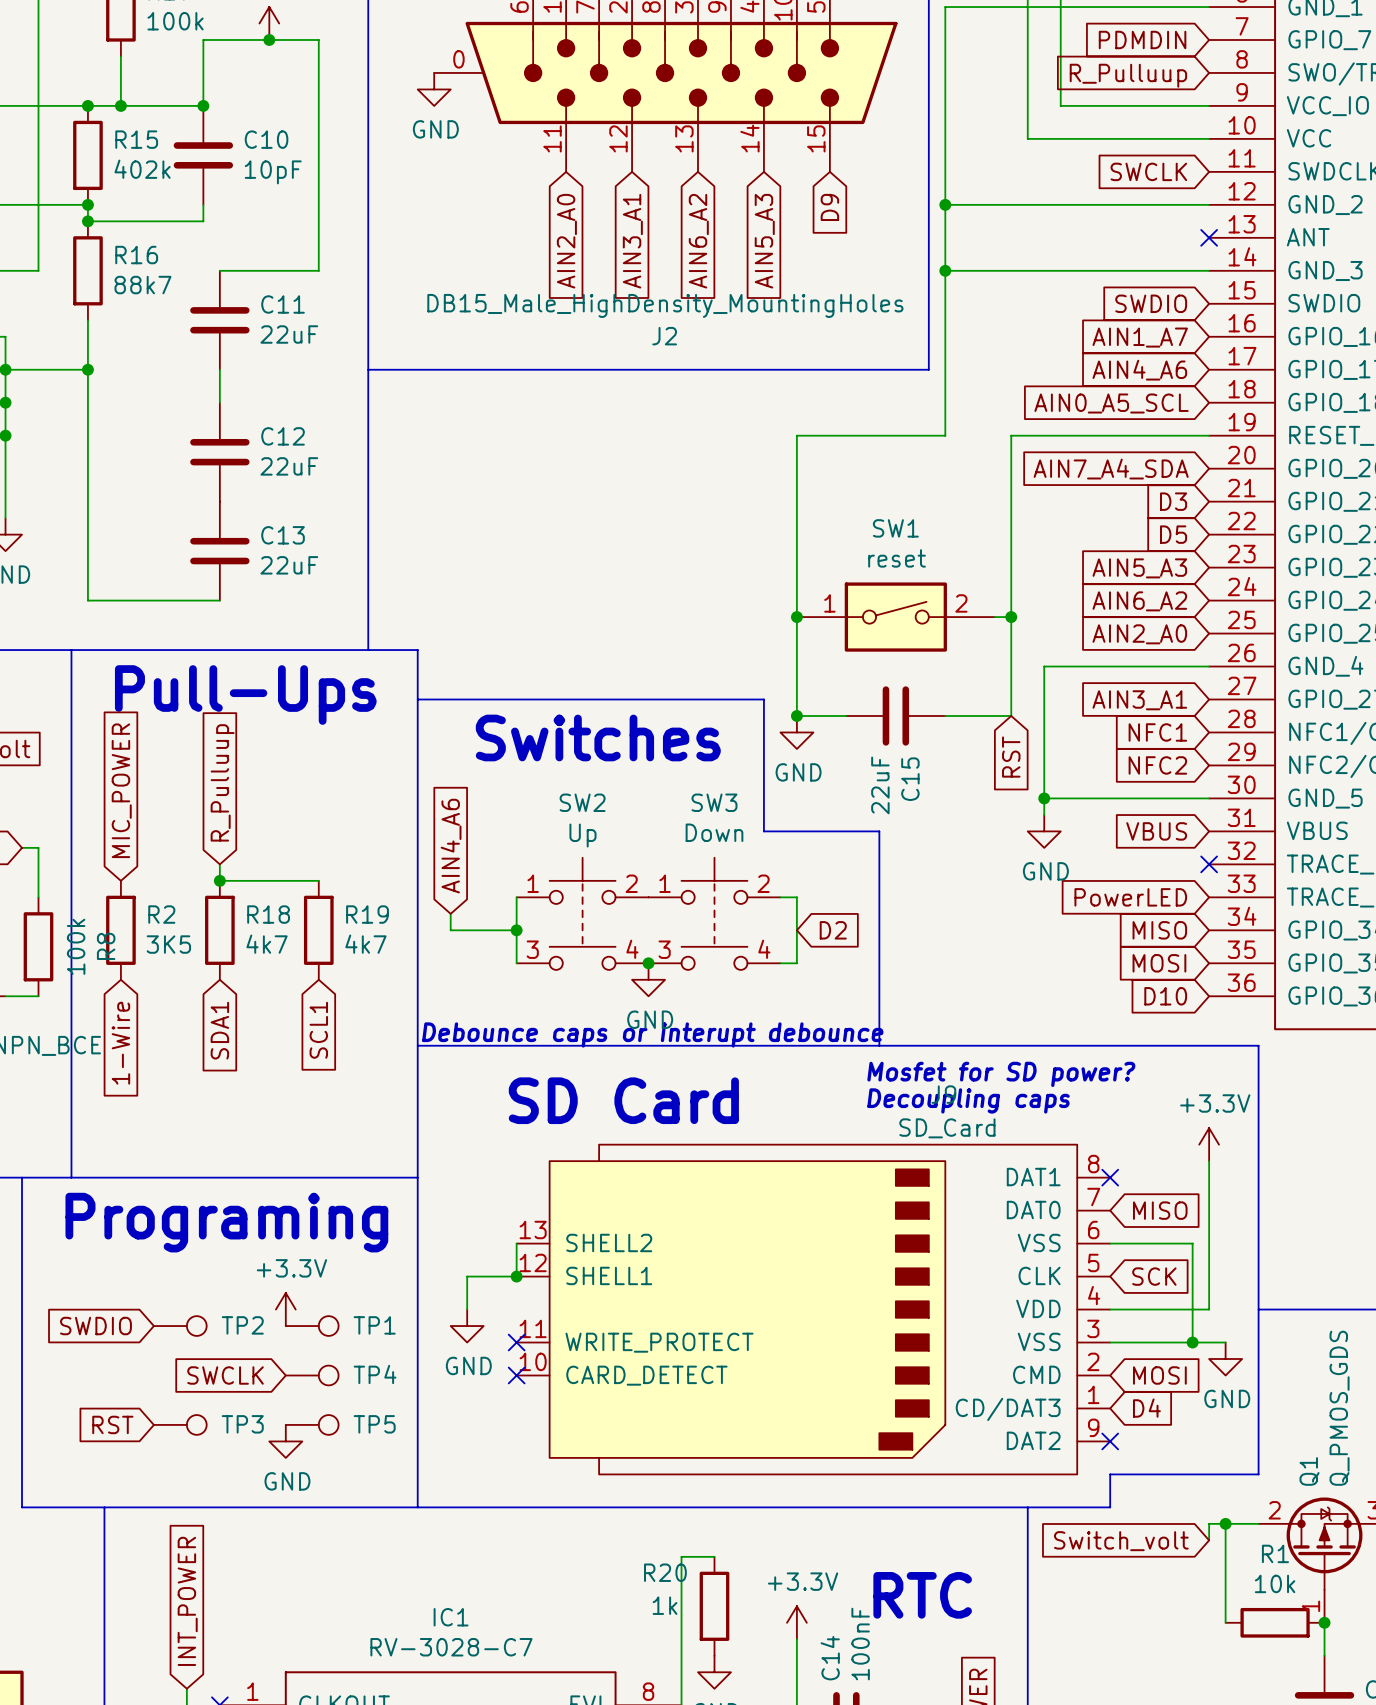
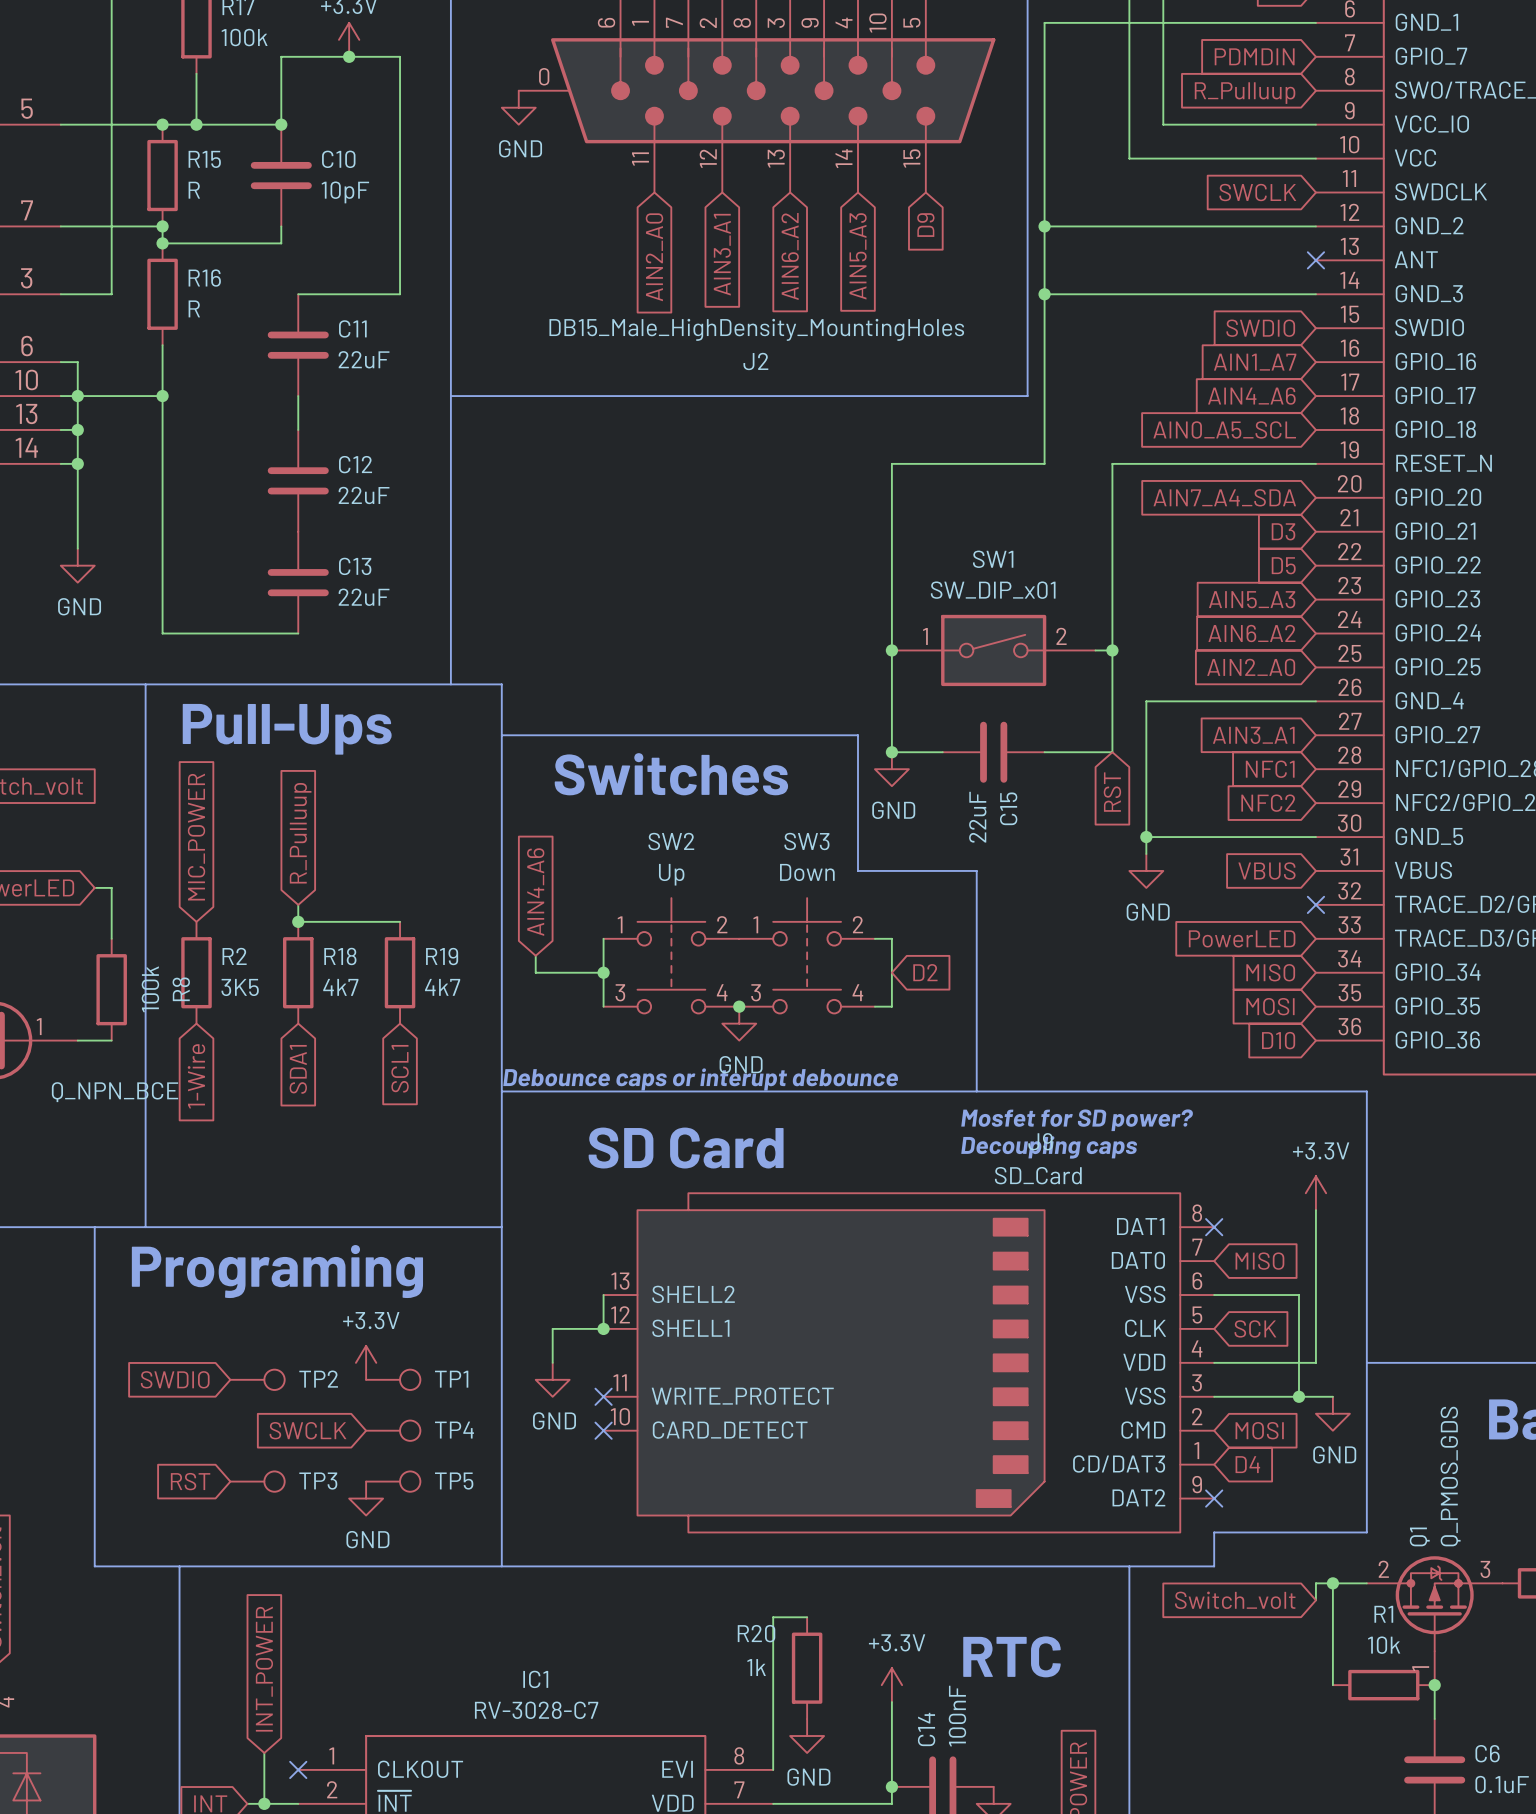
R15 value: 402k (142, 169) -> R (194, 190)
R16 value: 88k7 (142, 285) -> R (194, 308)
SW1 value: reset (897, 558) -> SW_DIP_x01 (993, 590)

